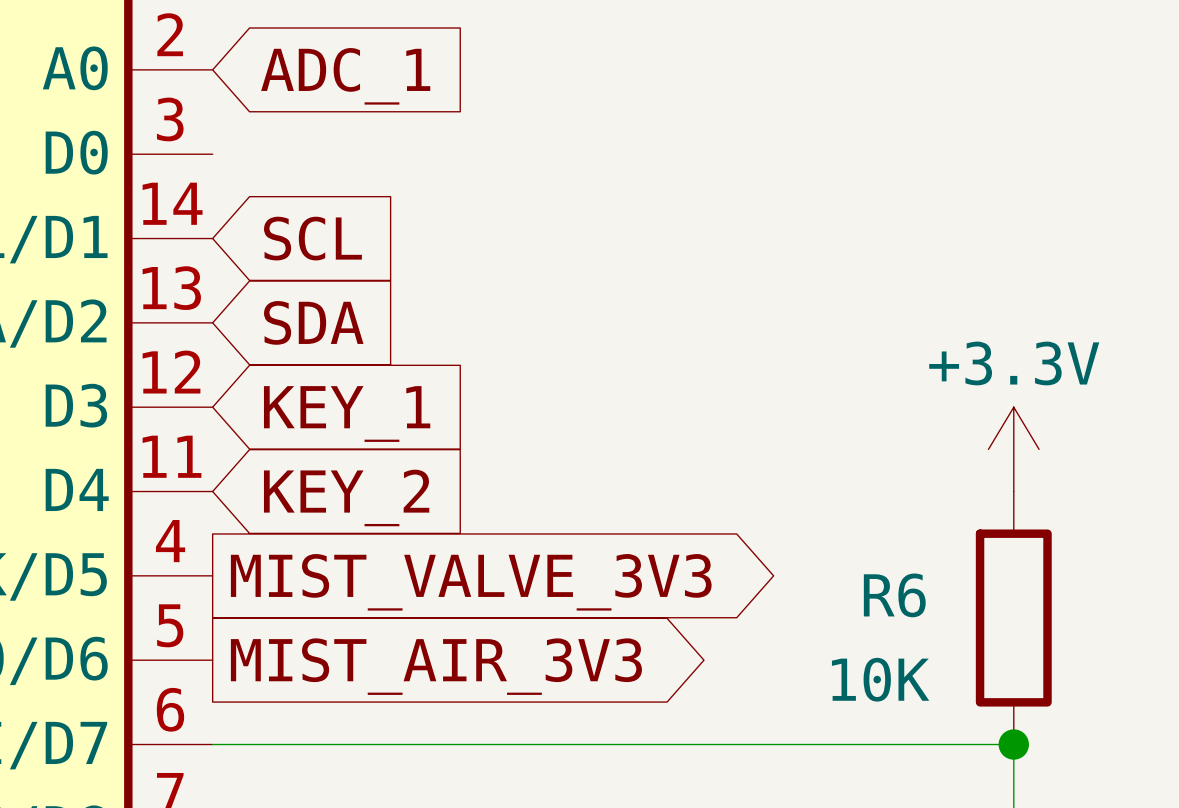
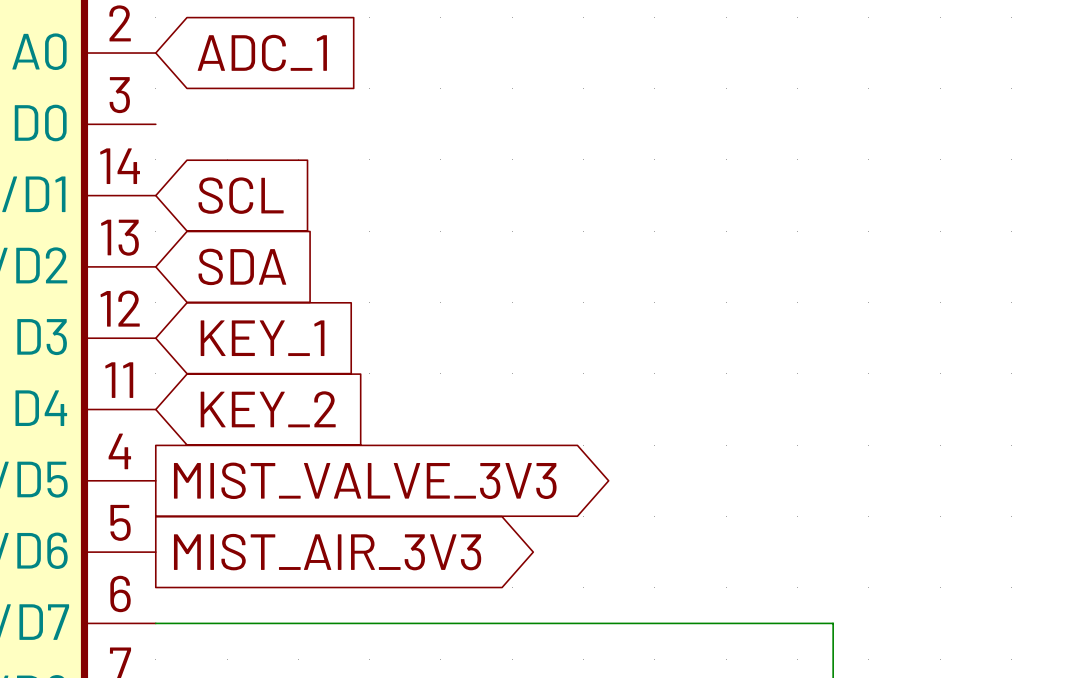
power symbol: +3.3V (1013, 449) -> none
R6: 10K (1013, 618) -> none
junction: (1013, 744) -> none

